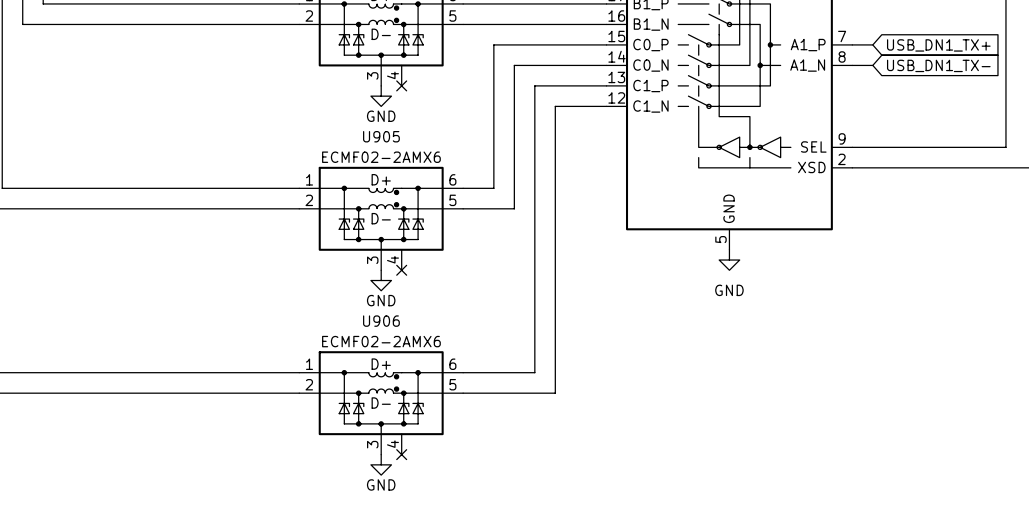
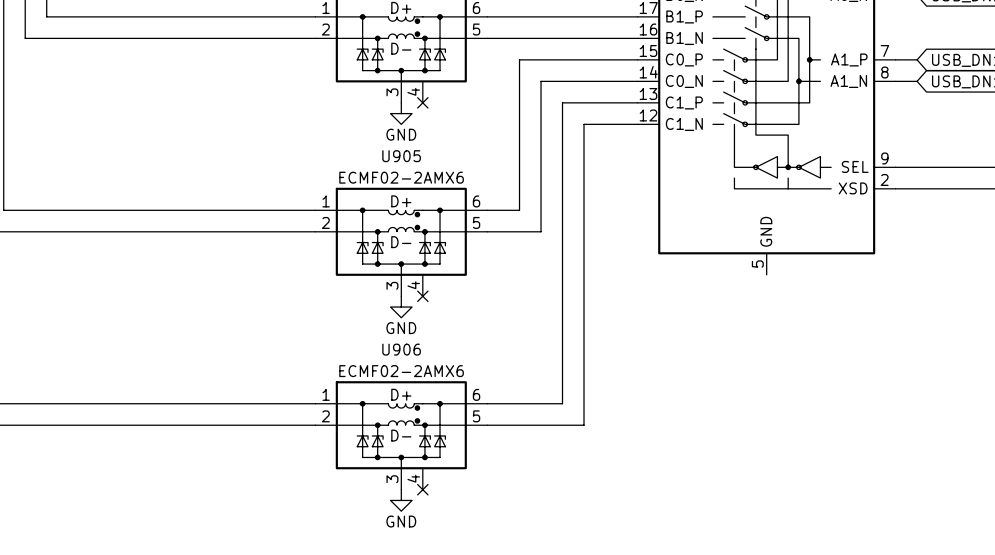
power symbol: GND (729, 260) -> none

